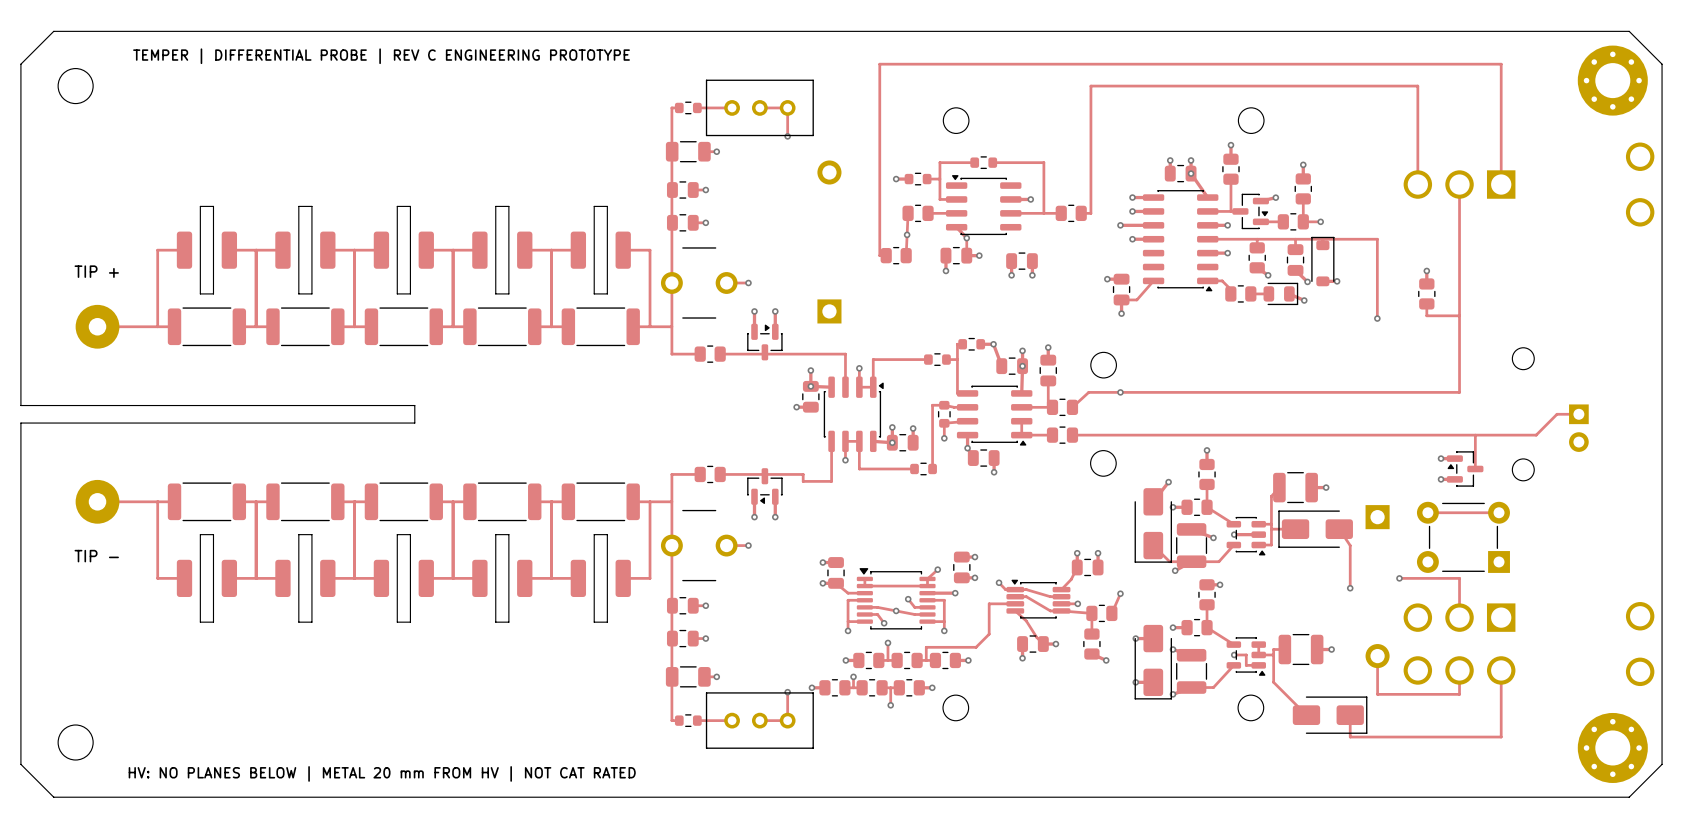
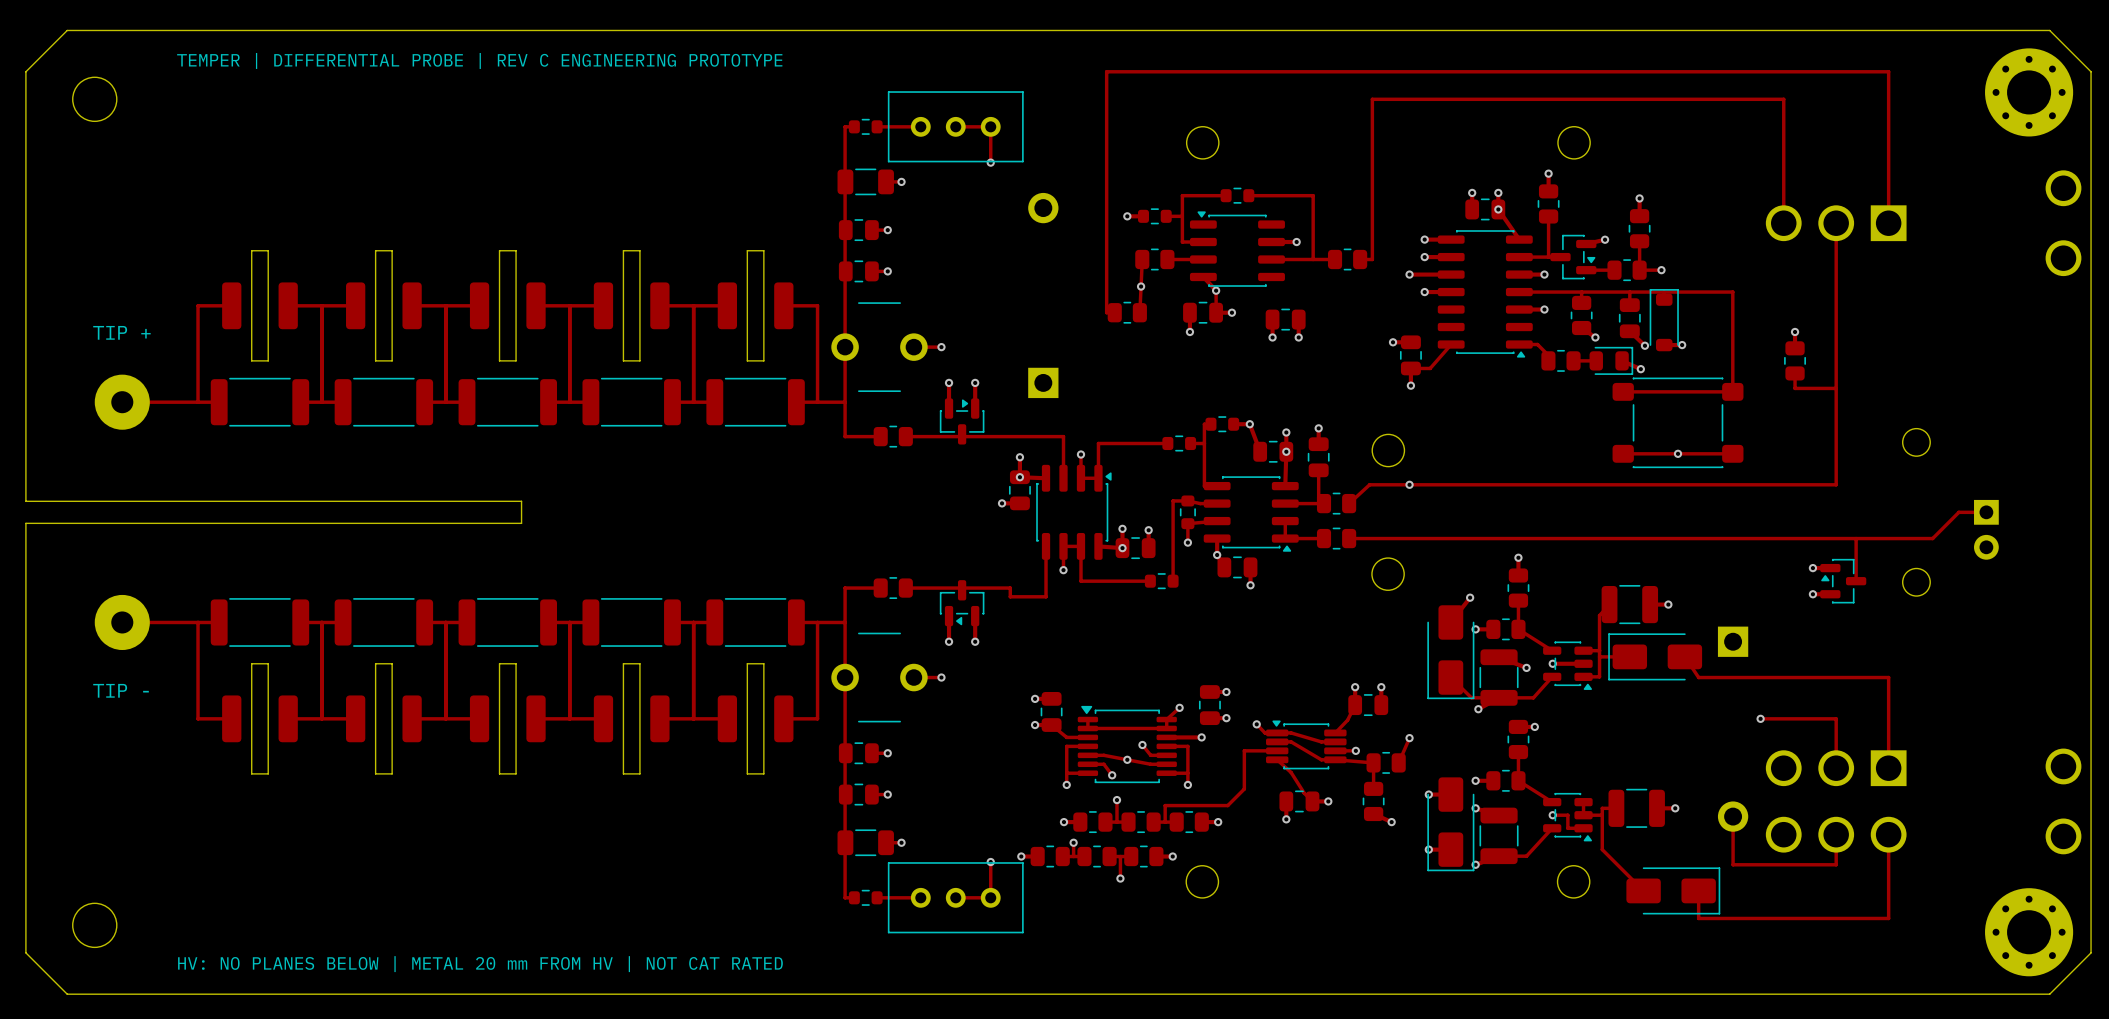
track: none -> (1623, 391) (1732, 391)
via: (1377, 318) -> none
part: none -> (1678, 422)
track: none -> (1623, 453) (1732, 453)
via: none -> (1678, 453)
track: (1427, 512) (1499, 512) -> none
part: (1463, 537) -> none
track: (1350, 545) (1350, 588) -> (1698, 677) (1888, 677) (1888, 768)
via: (1350, 588) -> none

